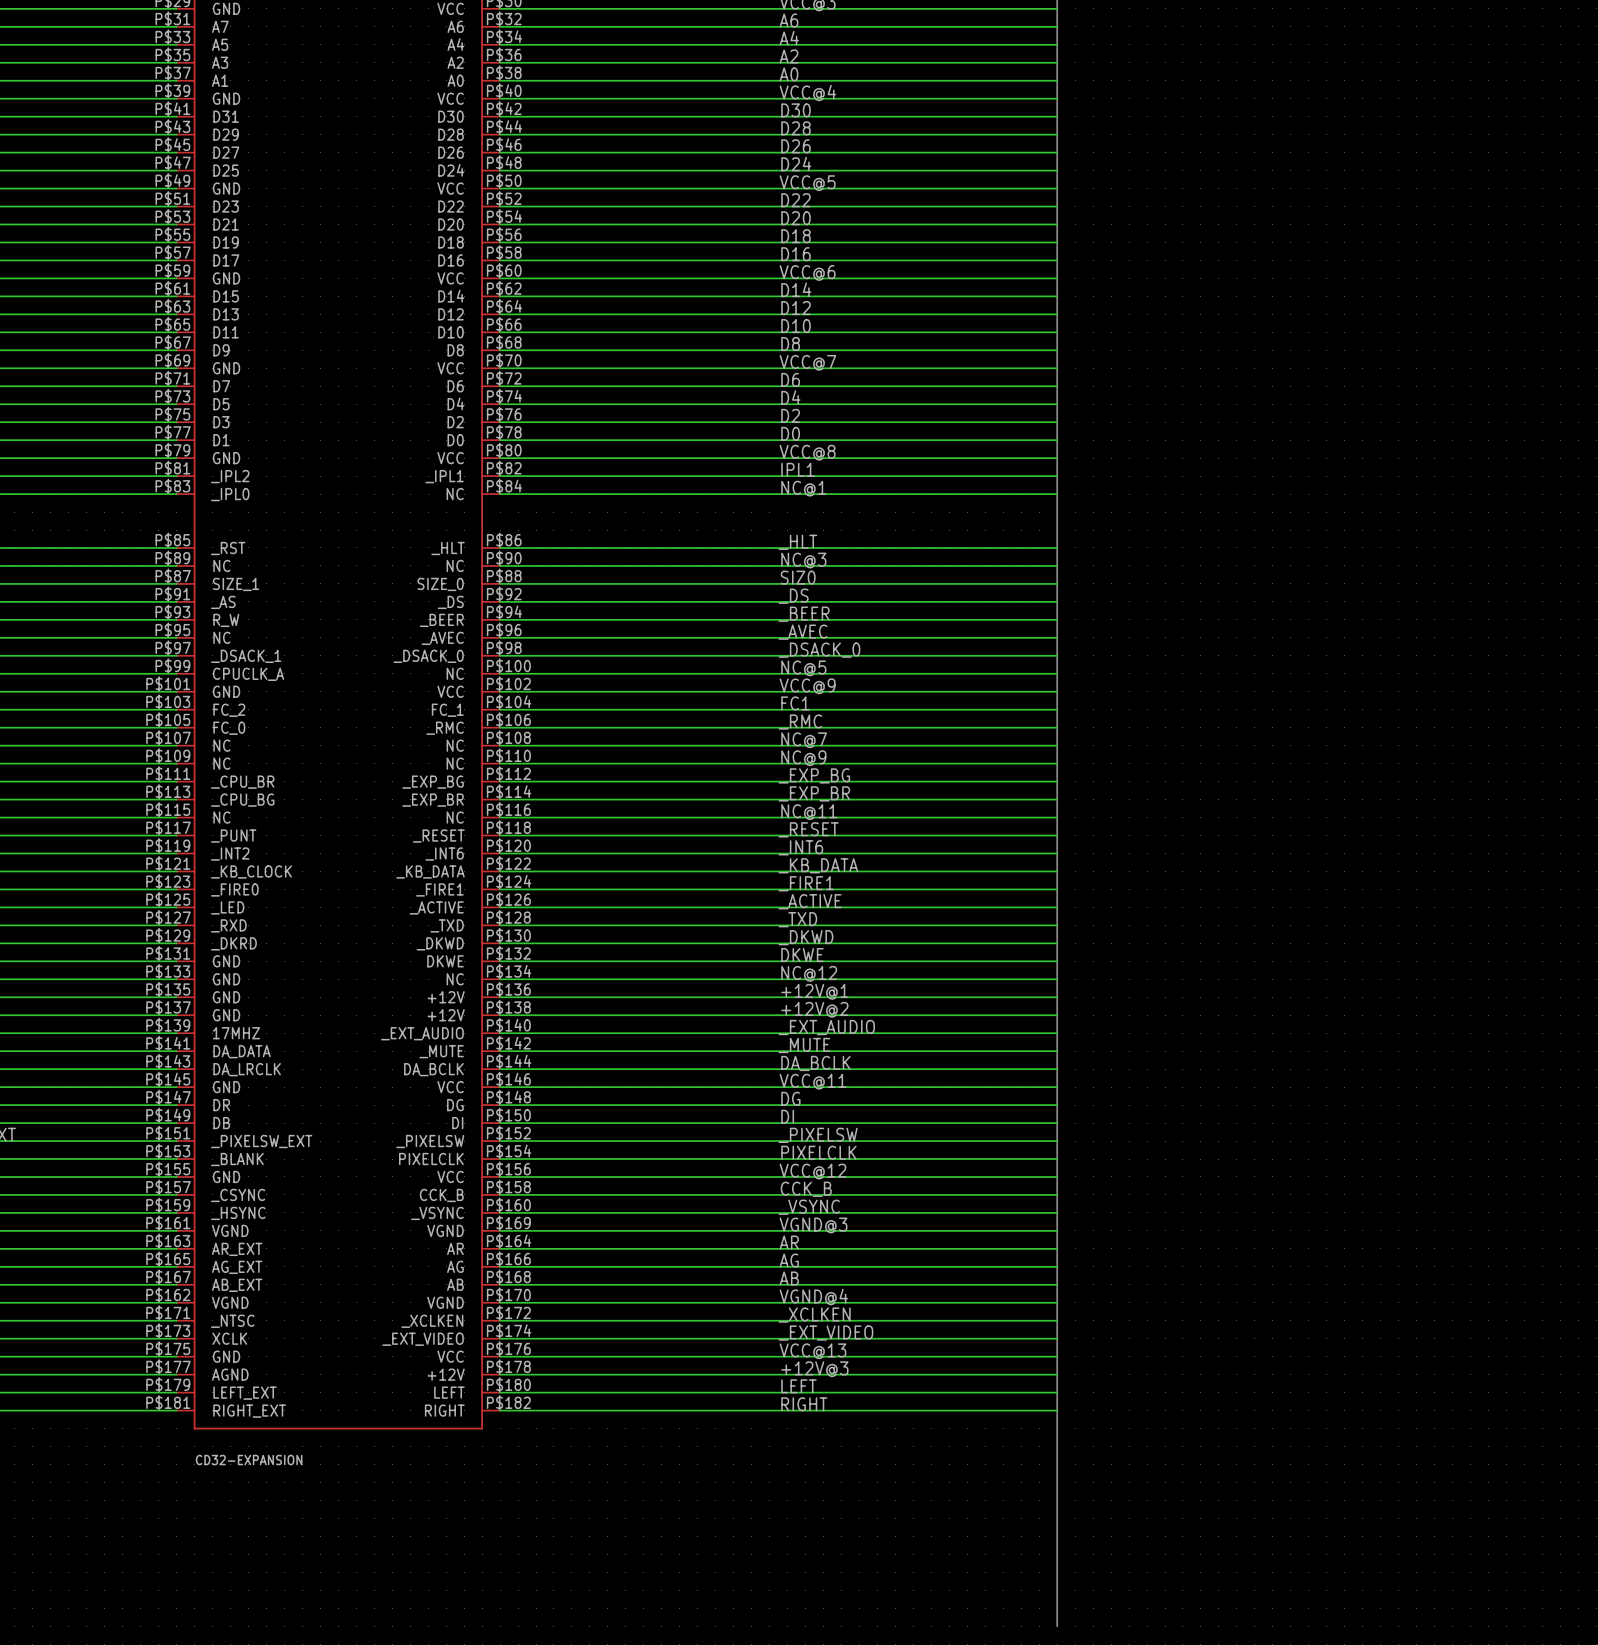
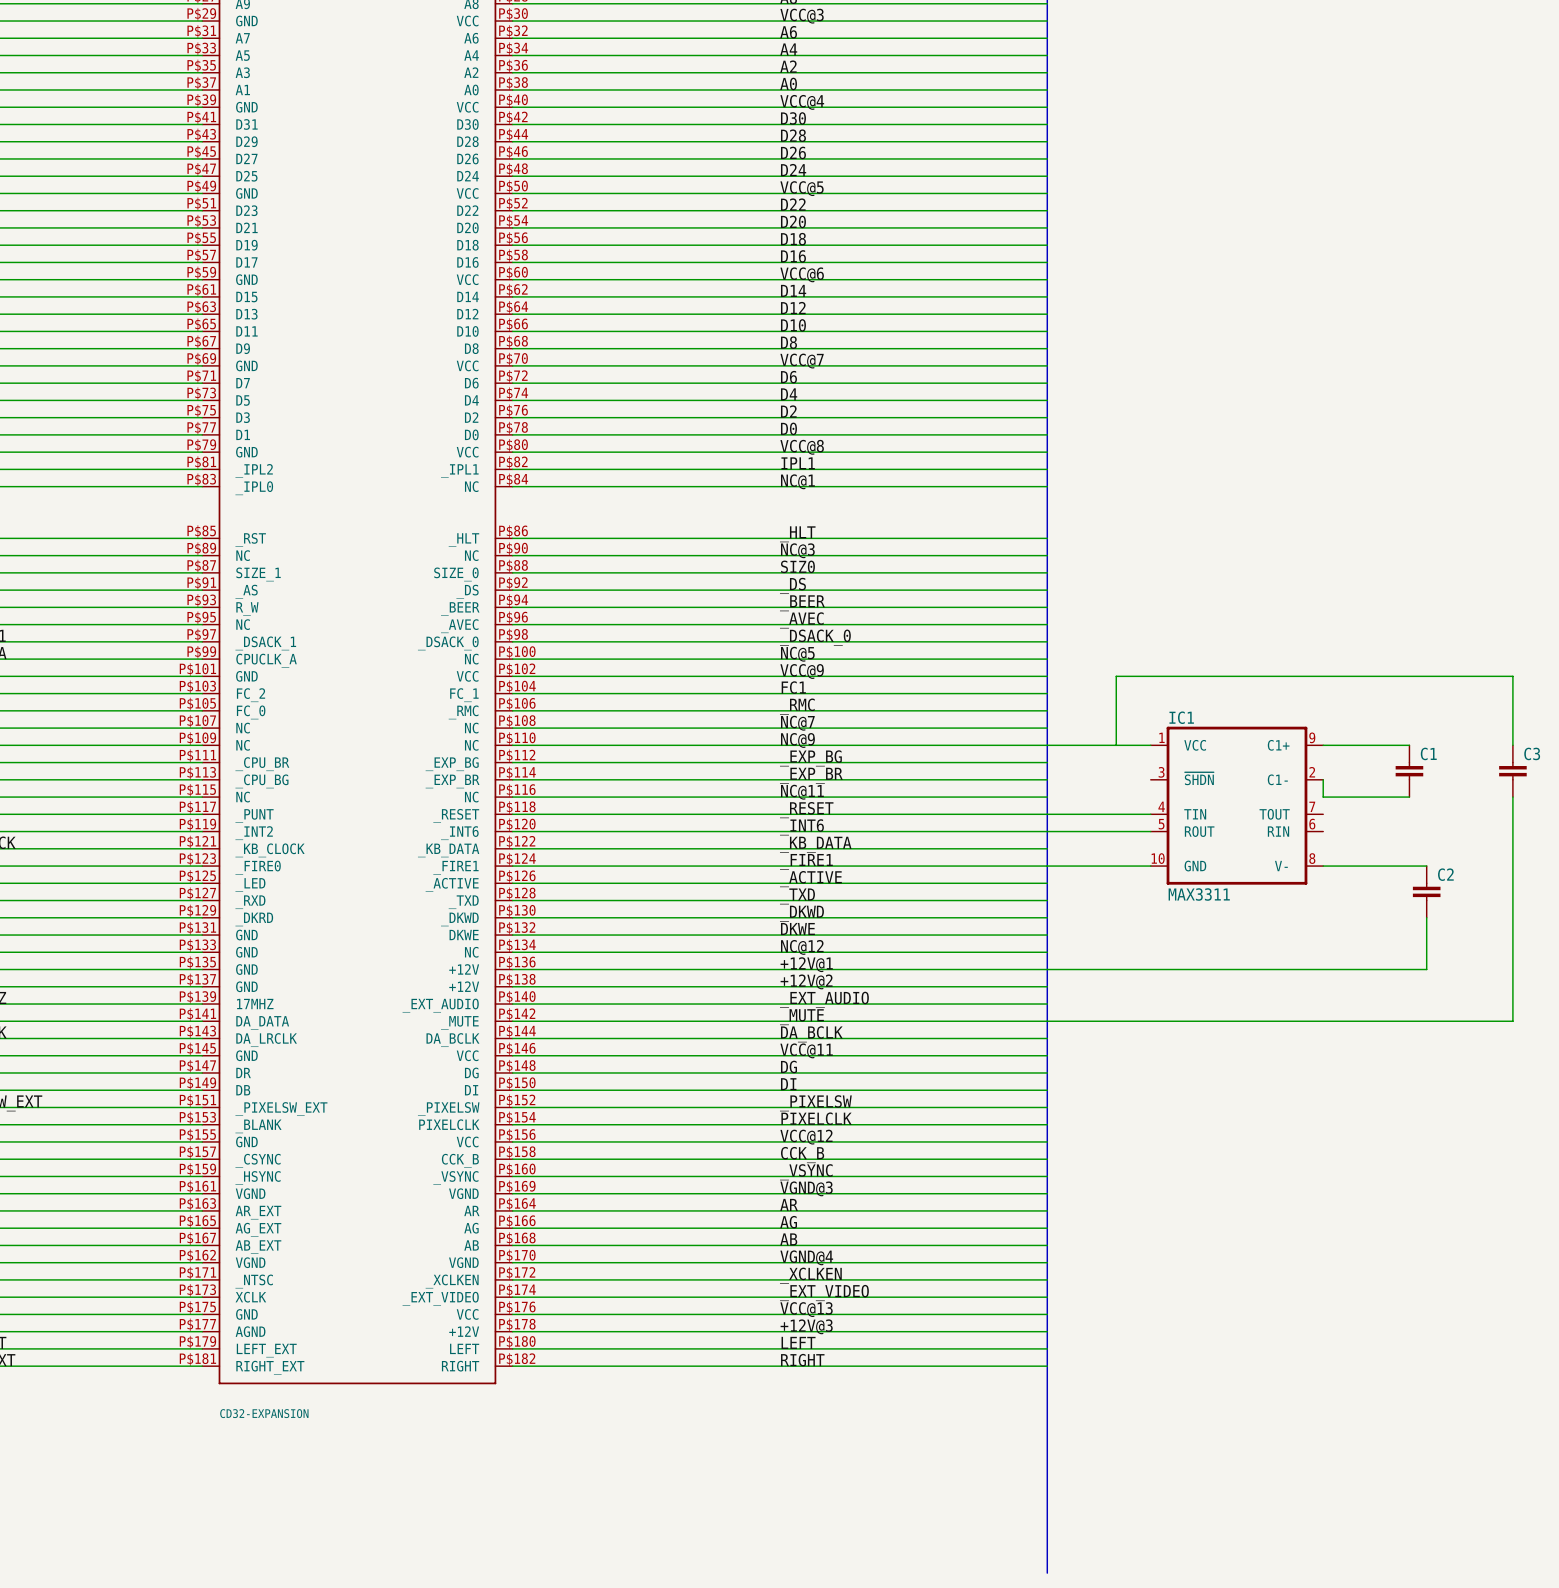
wire: none -> (1047, 745) (1150, 745)
wire: none -> (1116, 745) (1116, 676) (1512, 676) (1512, 745)
wire: none -> (1323, 745) (1409, 745)
C1: none -> (1409, 771)
C3: none -> (1512, 771)
wire: none -> (1323, 779) (1323, 797) (1409, 797)
wire: none -> (1512, 797) (1512, 1021) (1047, 1021)
IC1: none -> MAX3311 (1236, 805)
wire: none -> (1047, 814) (1150, 814)
wire: none -> (1047, 831) (1150, 831)
wire: none -> (1047, 866) (1150, 866)
wire: none -> (1323, 866) (1426, 866)
C2: none -> (1426, 891)
wire: none -> (1426, 917) (1426, 969) (1047, 969)

